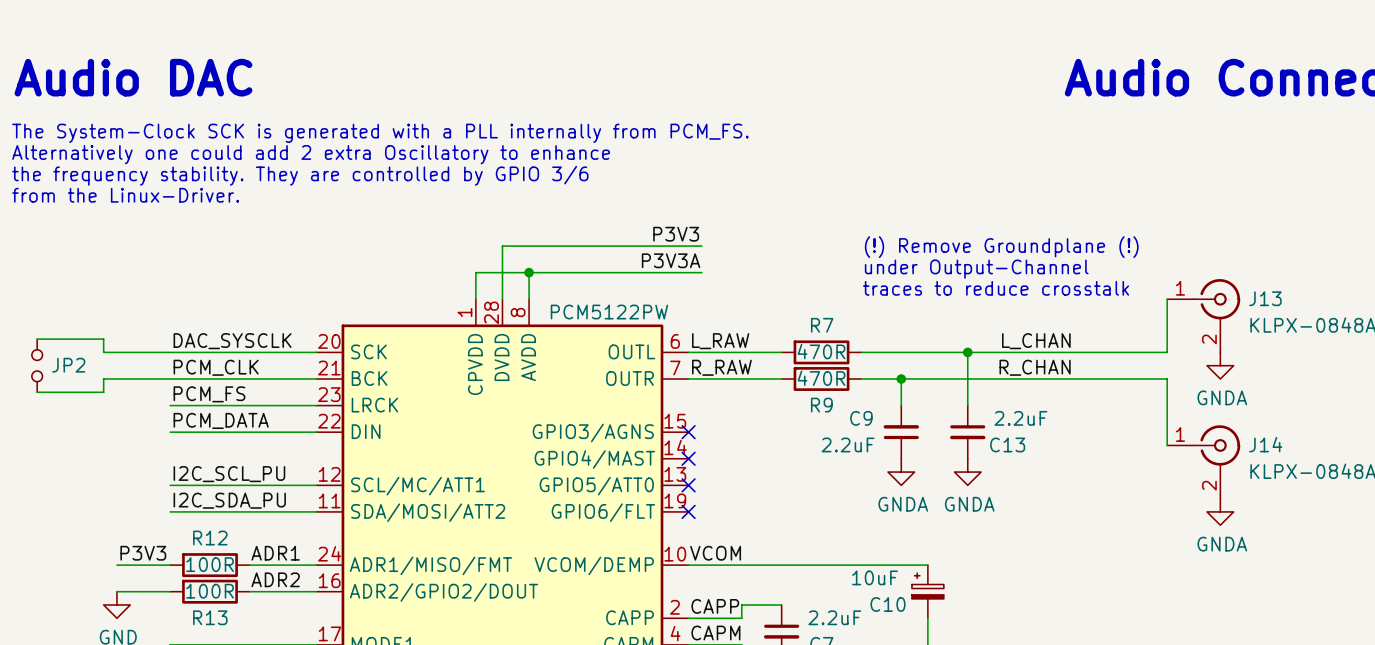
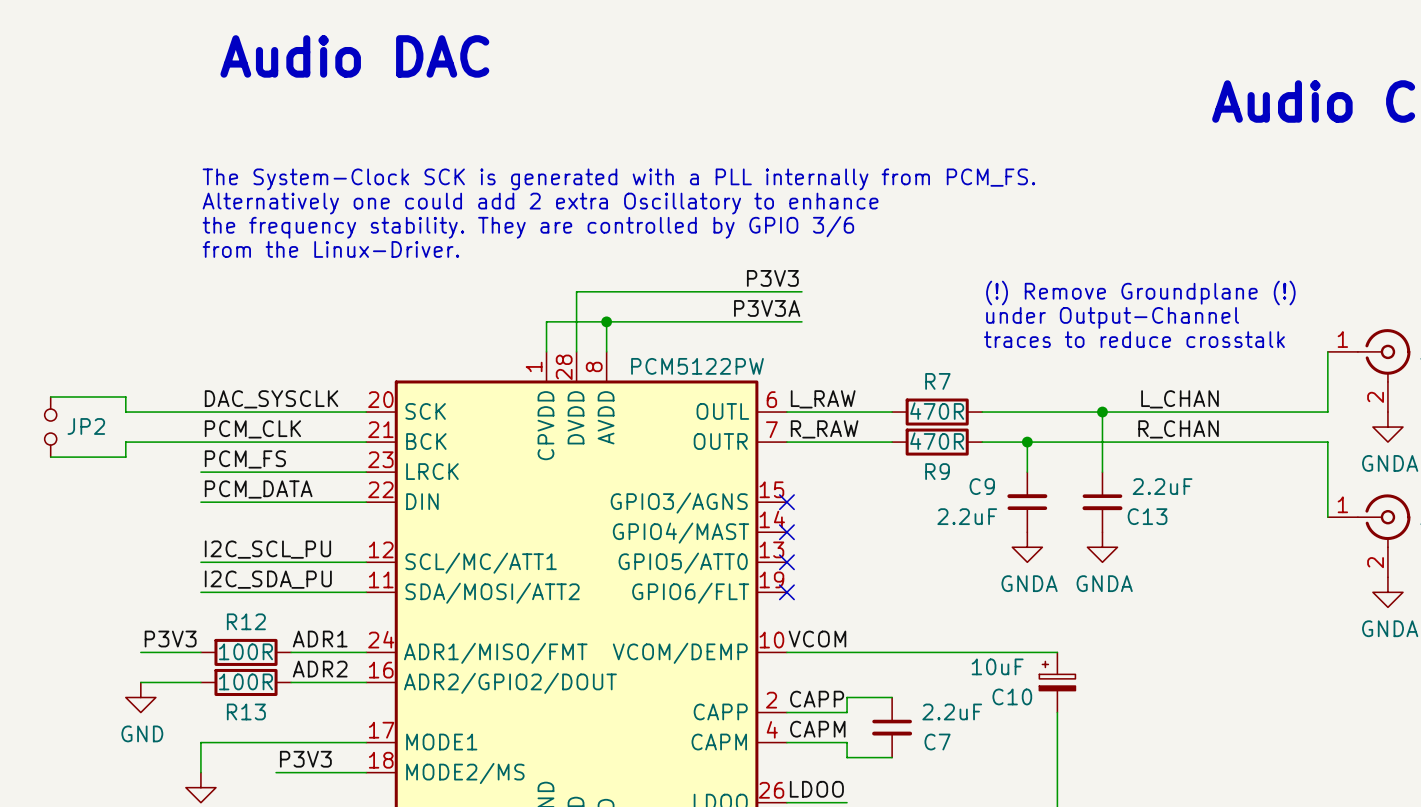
text position: Audio DAC (133, 77) -> Audio DAC (354, 56)
text position: The System-Clock SCK is generated with a PLL internally from PCM_FS. (380, 133) -> The System-Clock SCK is generated with a PLL internally from PCM_FS. (618, 179)
text position: Alternatively one could add 2 extra Oscillatory to enhance (311, 154) -> Alternatively one could add 2 extra Oscillatory to enhance (540, 203)
text position: the frequency stability. They are controlled by GPIO 3/6 (300, 175) -> the frequency stability. They are controlled by GPIO 3/6 (528, 227)
text position: from the Linux-Driver. (125, 195) -> from the Linux-Driver. (330, 249)

